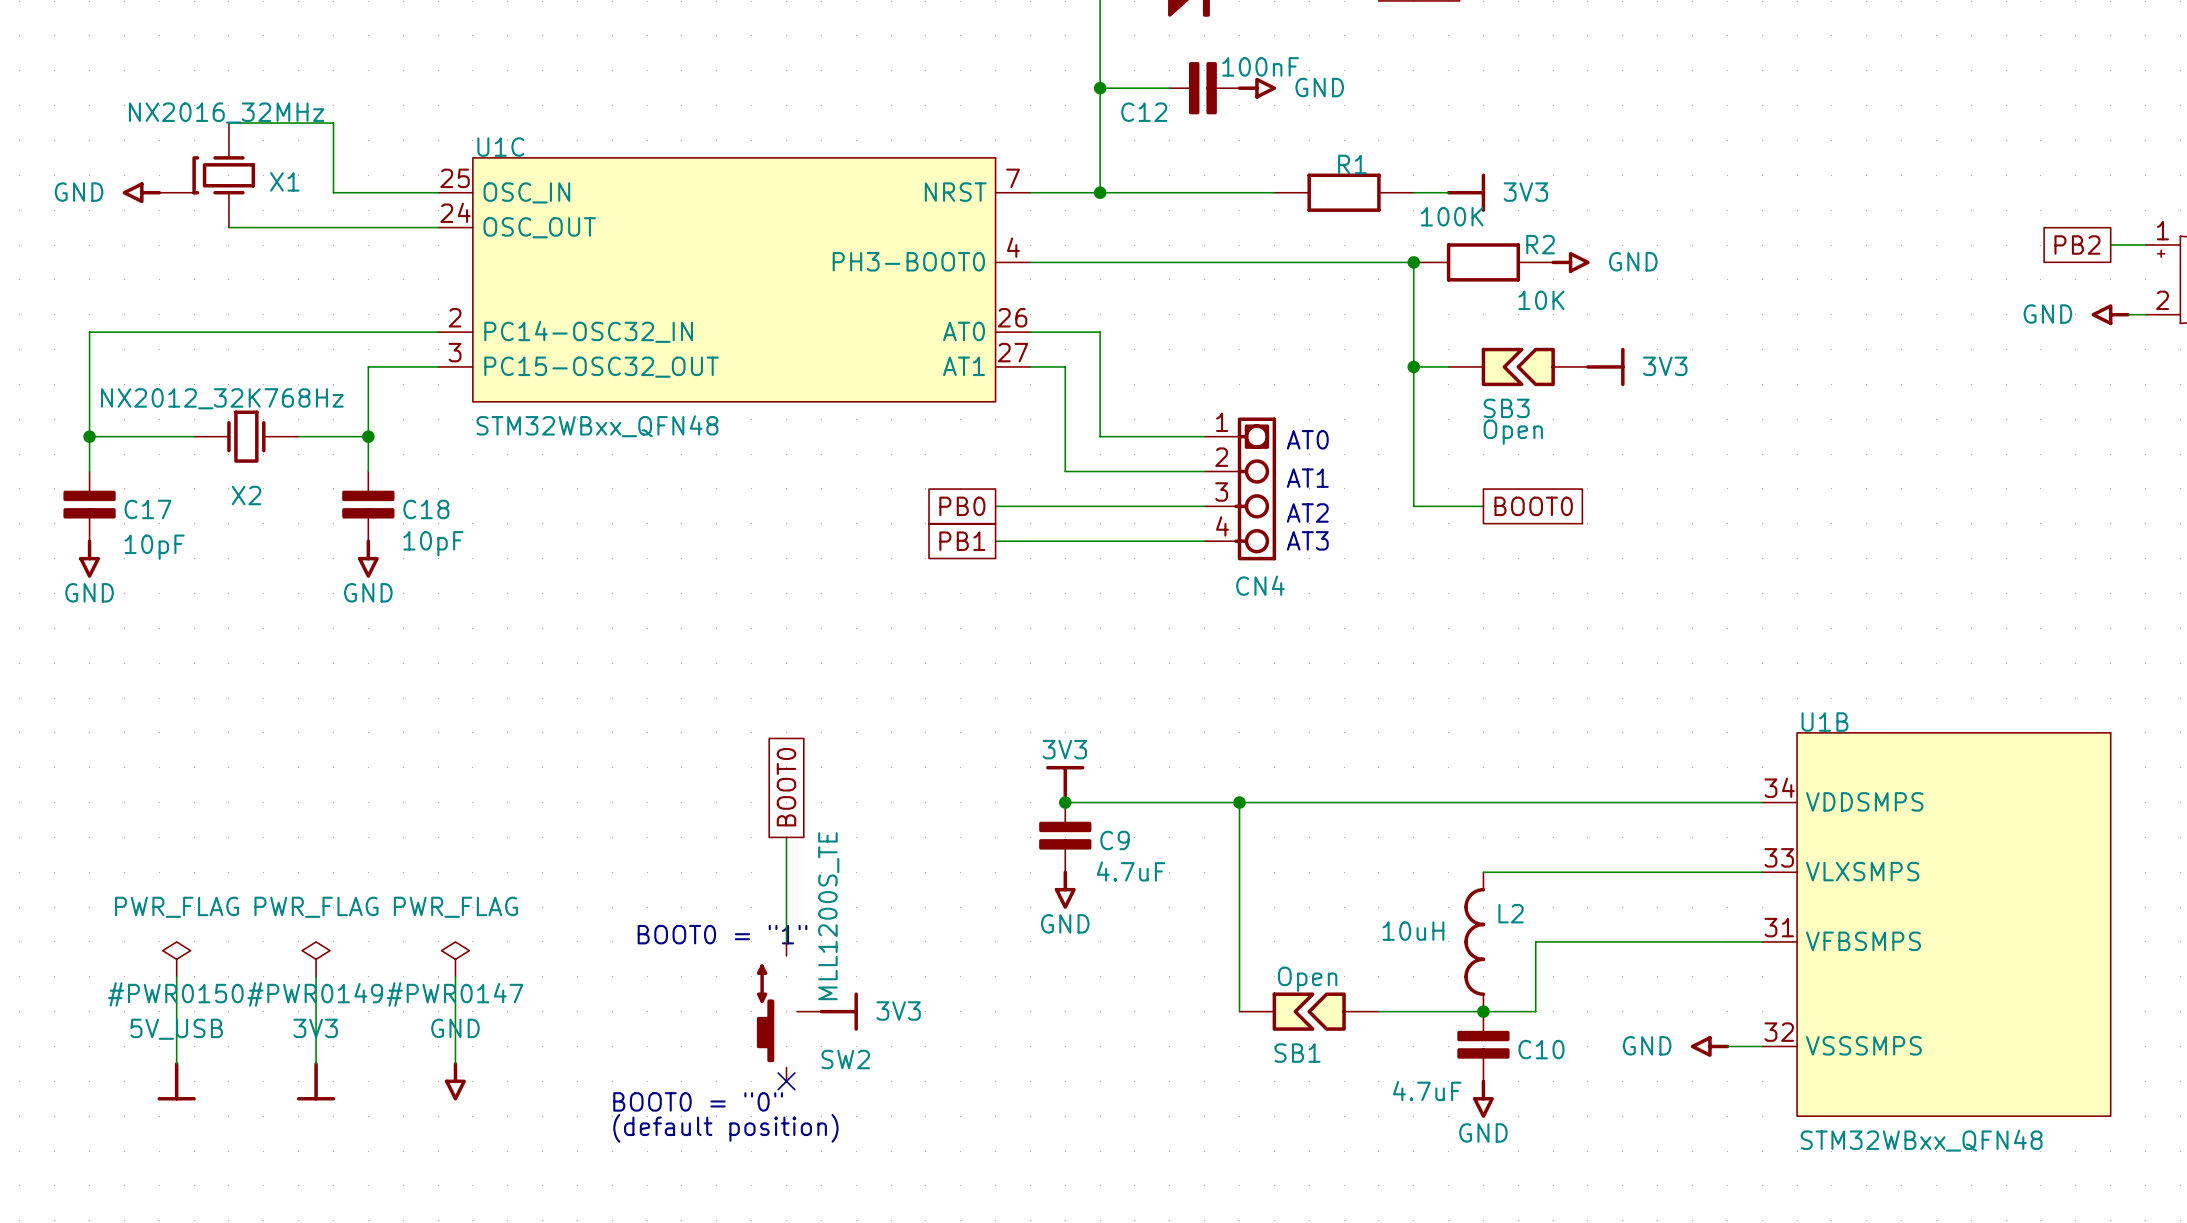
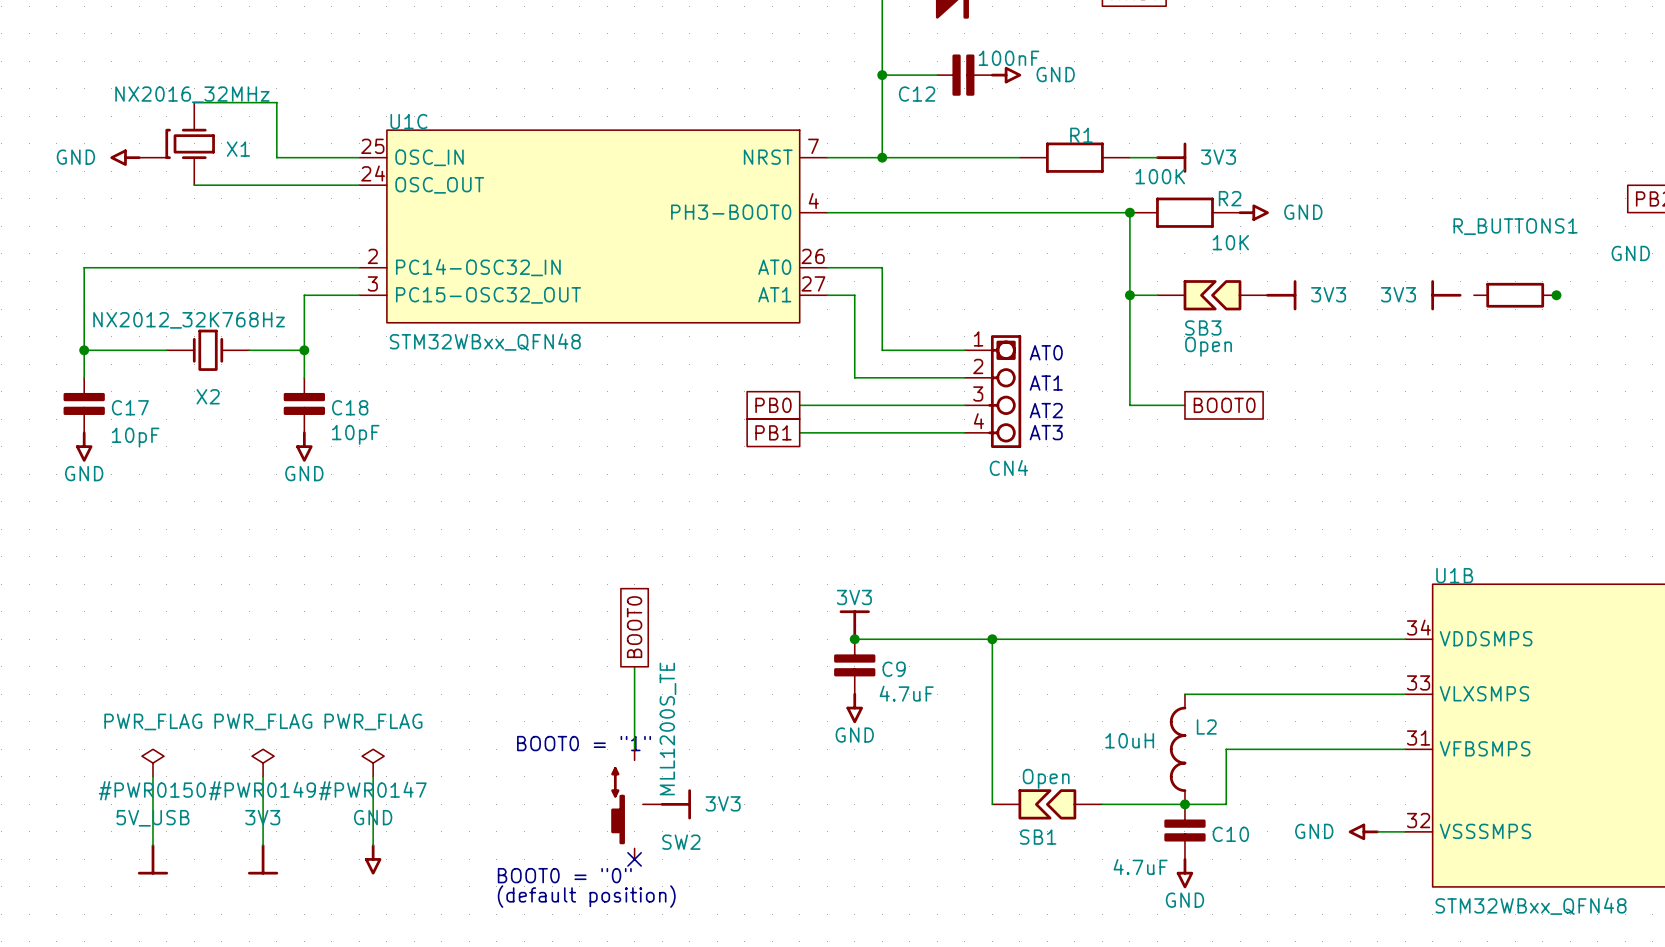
power symbol: none -> 3V3 (1446, 295)
R_BUTTONS1: none -> (1515, 295)
junction: none -> (1556, 295)

